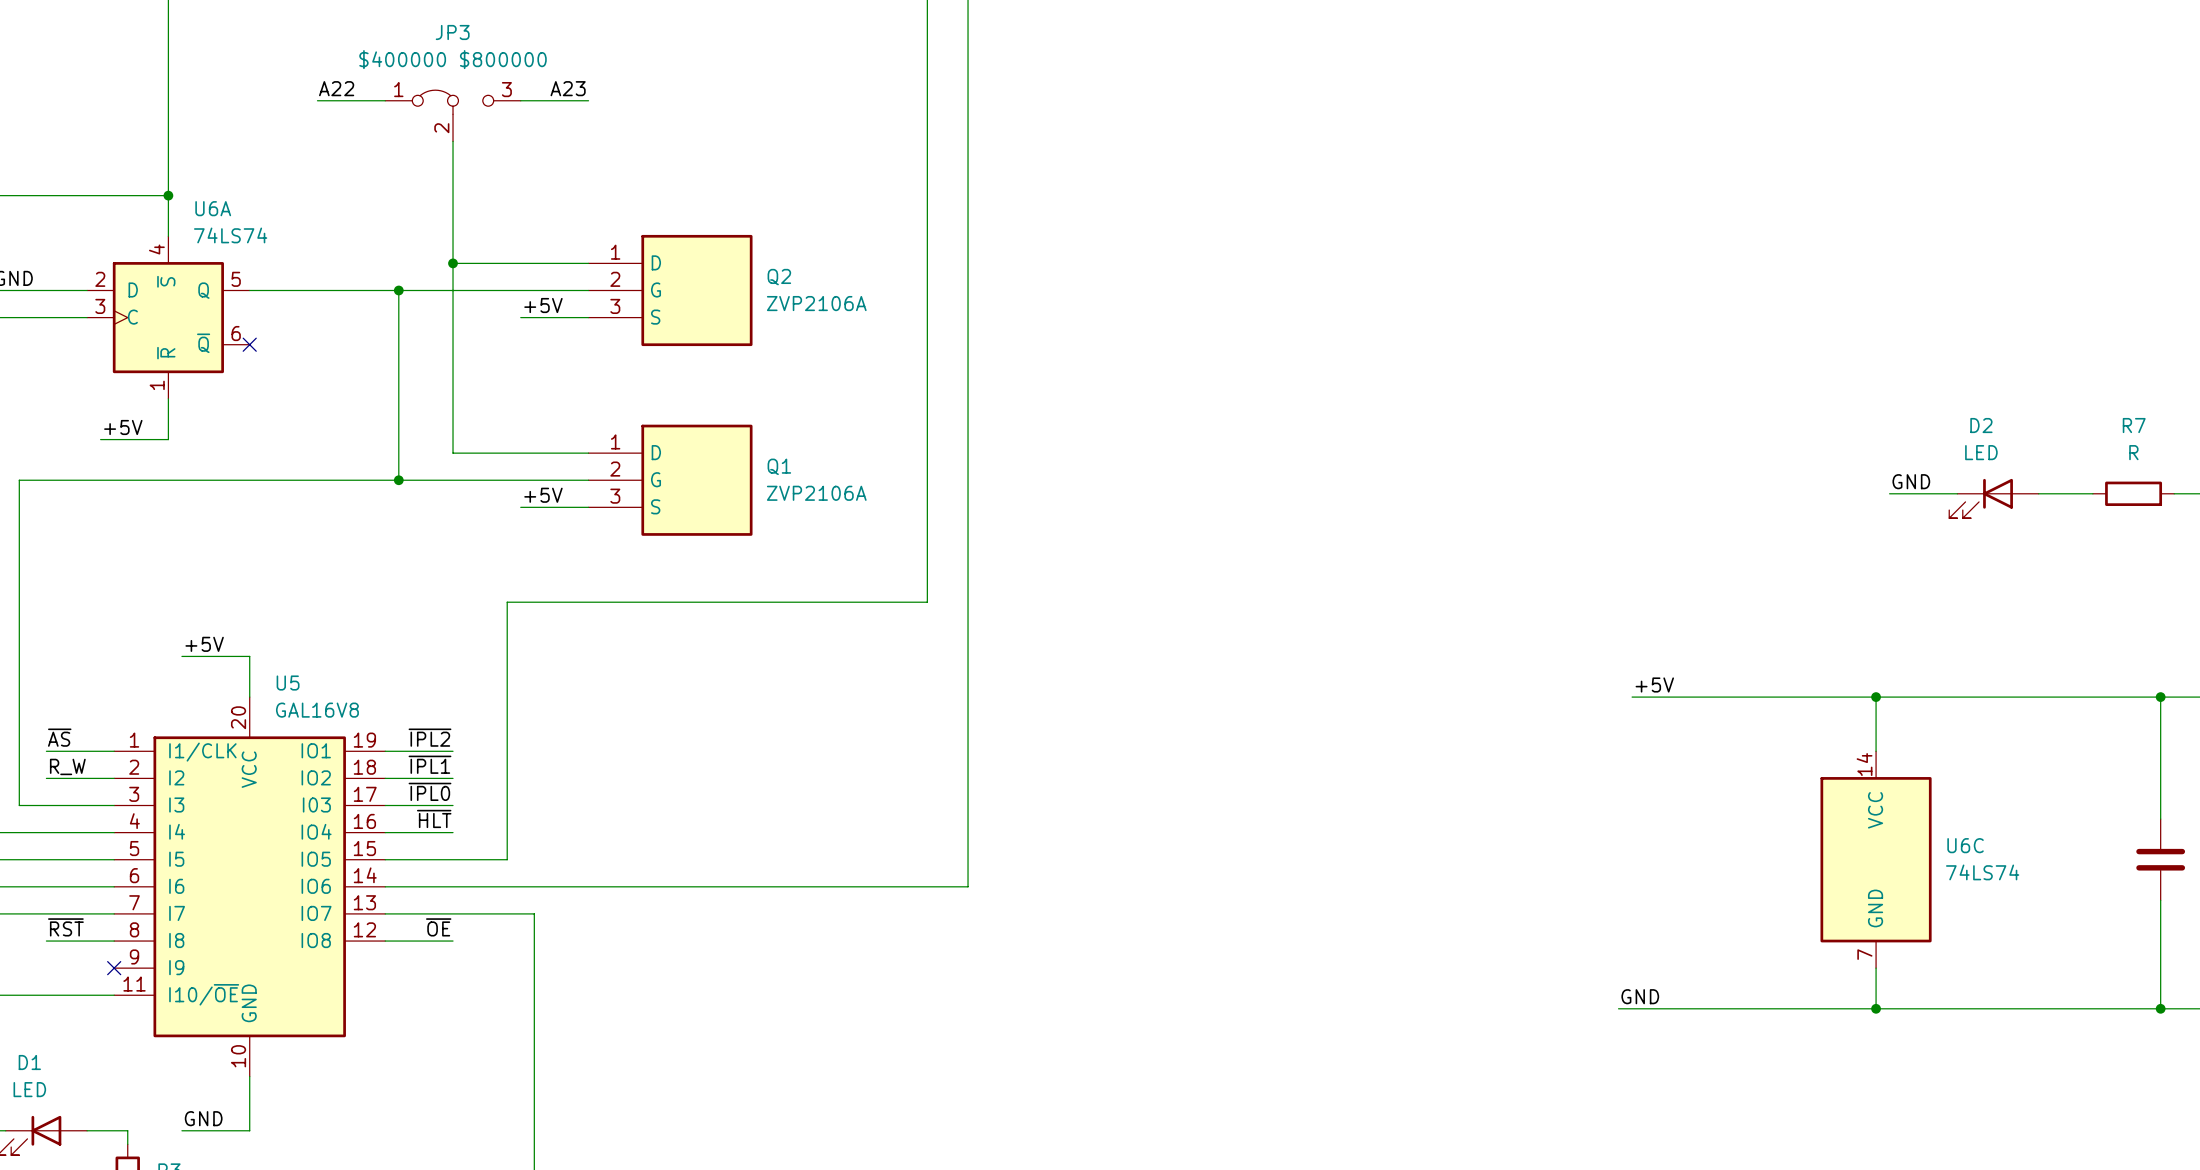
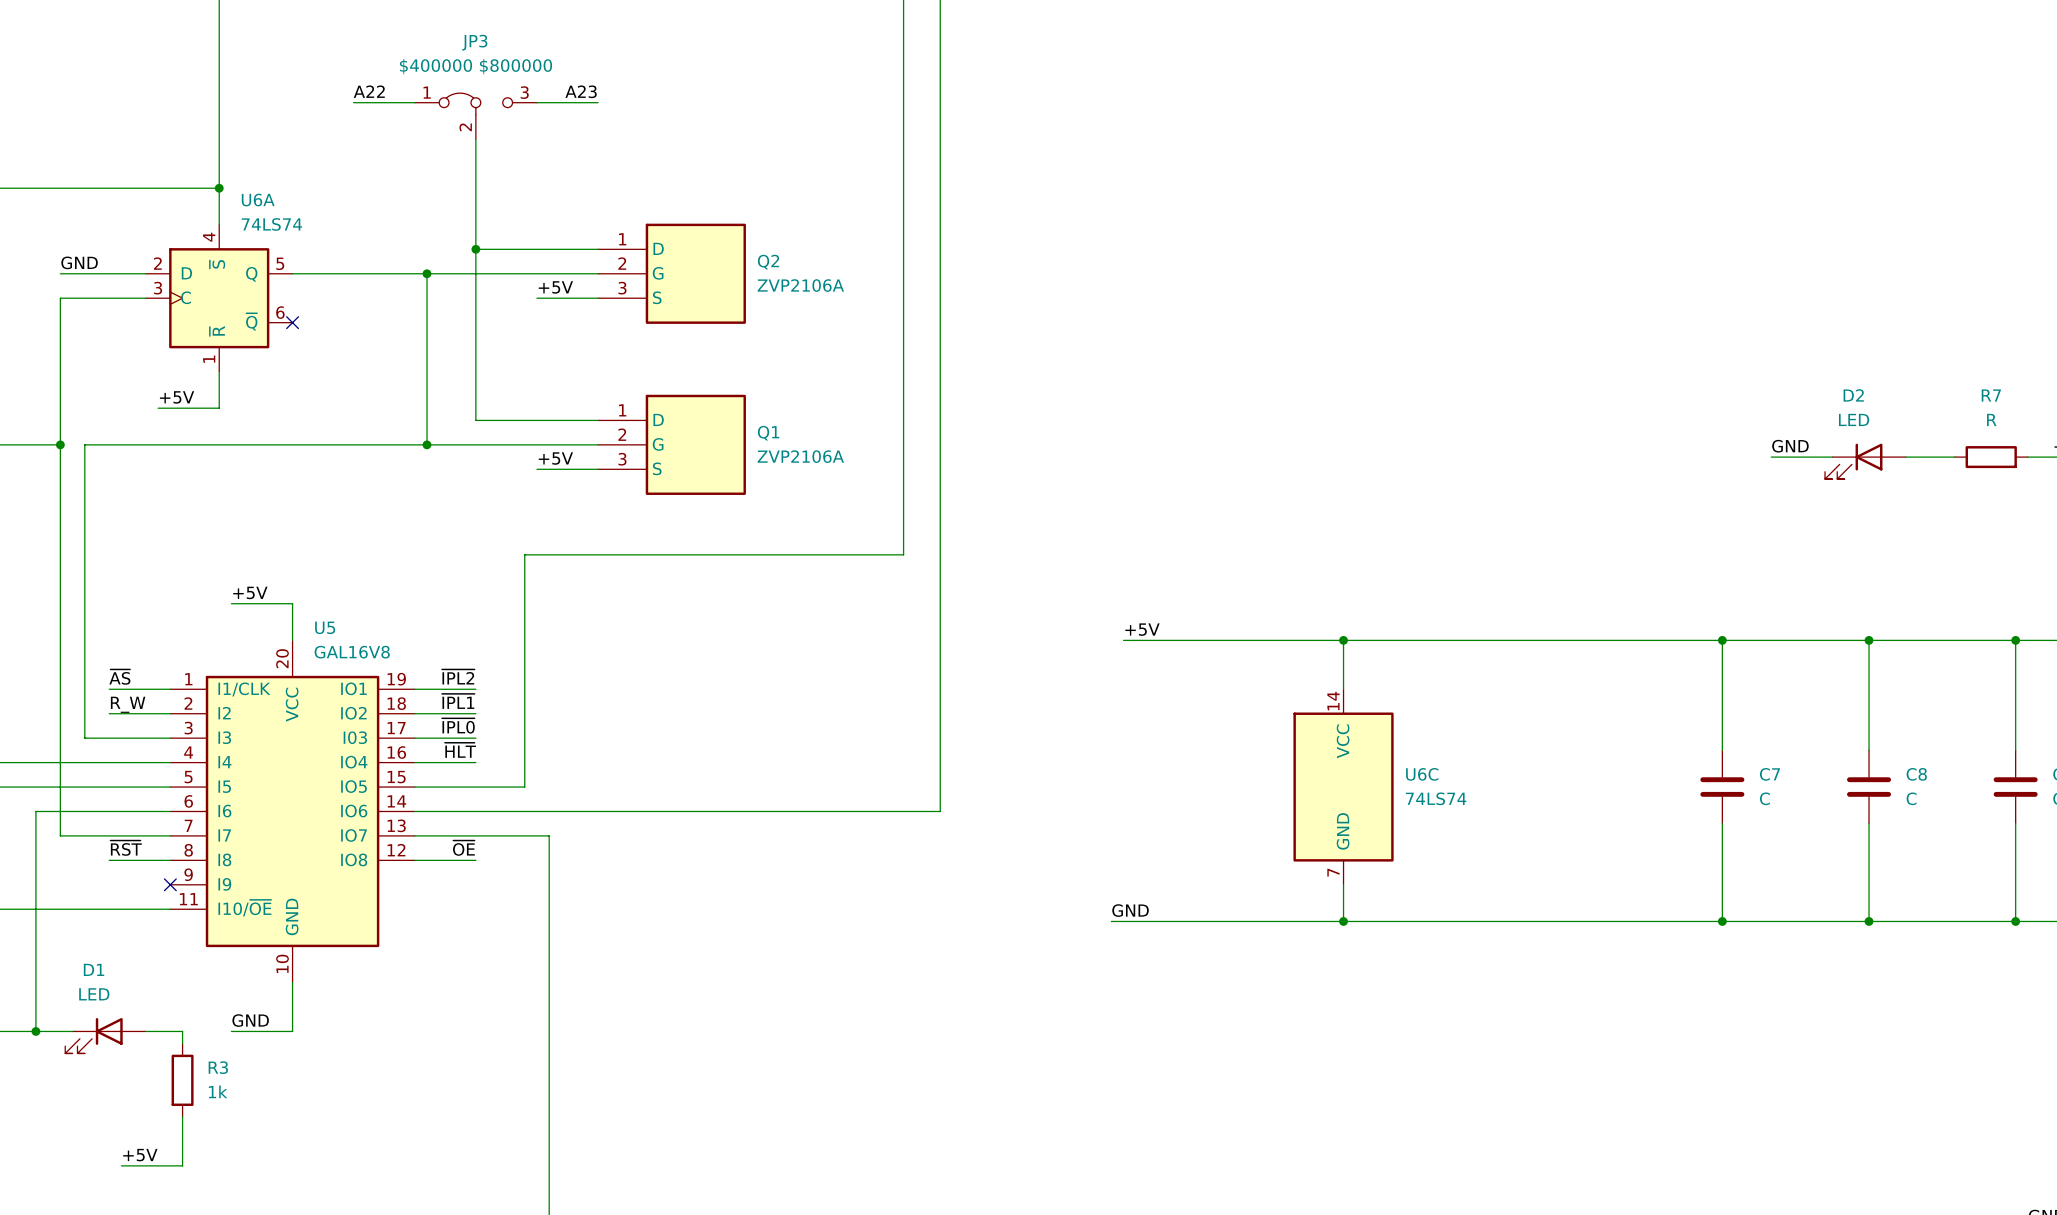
label: none -> +5V (1142, 629)
label: +5V (1654, 684) -> none
wire: none -> (1123, 640) (1539, 640)
wire: none -> (1343, 640) (1343, 689)
junction: none -> (1343, 640)
wire: none -> (1722, 640) (1722, 750)
wire: (1876, 697) (1876, 751) -> none
junction position: (1876, 697) -> (1722, 640)
wire: none -> (1869, 640) (1869, 750)
junction: none -> (1869, 640)
C7: none -> C (1722, 787)
U6C position: (1876, 859) -> (1343, 787)
C8: none -> C (1869, 787)
wire: none -> (1722, 823) (1722, 921)
wire: none -> (1869, 823) (1869, 921)
wire: none -> (1343, 884) (1343, 921)
wire: (1876, 968) (1876, 1008) -> none
label: none -> GND (1130, 910)
label: GND (1640, 996) -> none
wire: none -> (1111, 921) (1526, 921)
junction: none -> (1343, 921)
junction position: (1876, 1008) -> (1722, 921)
junction: none -> (1869, 921)

